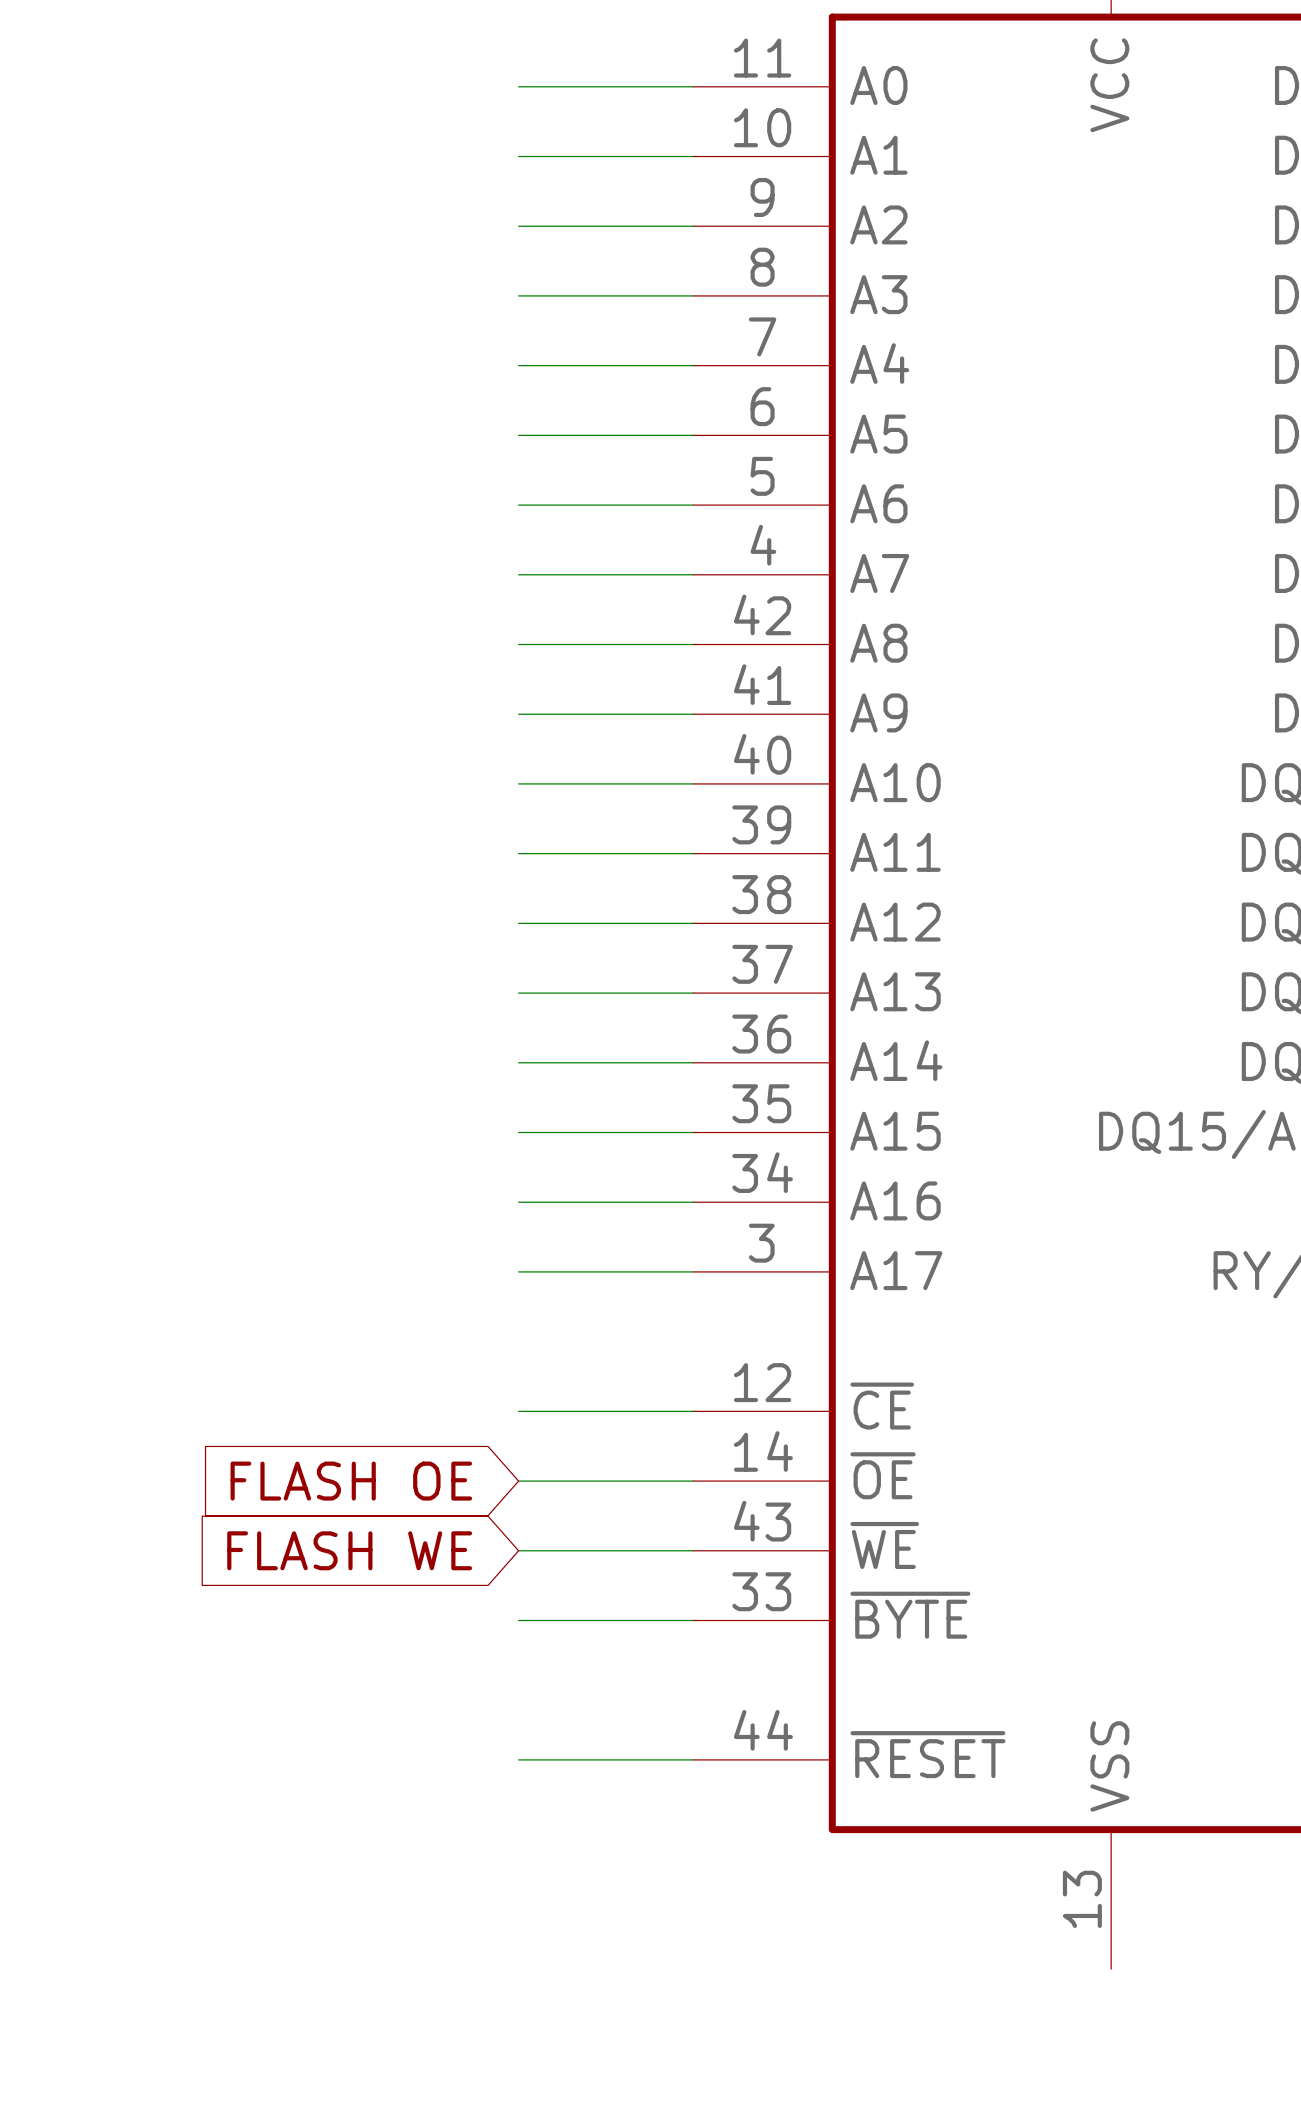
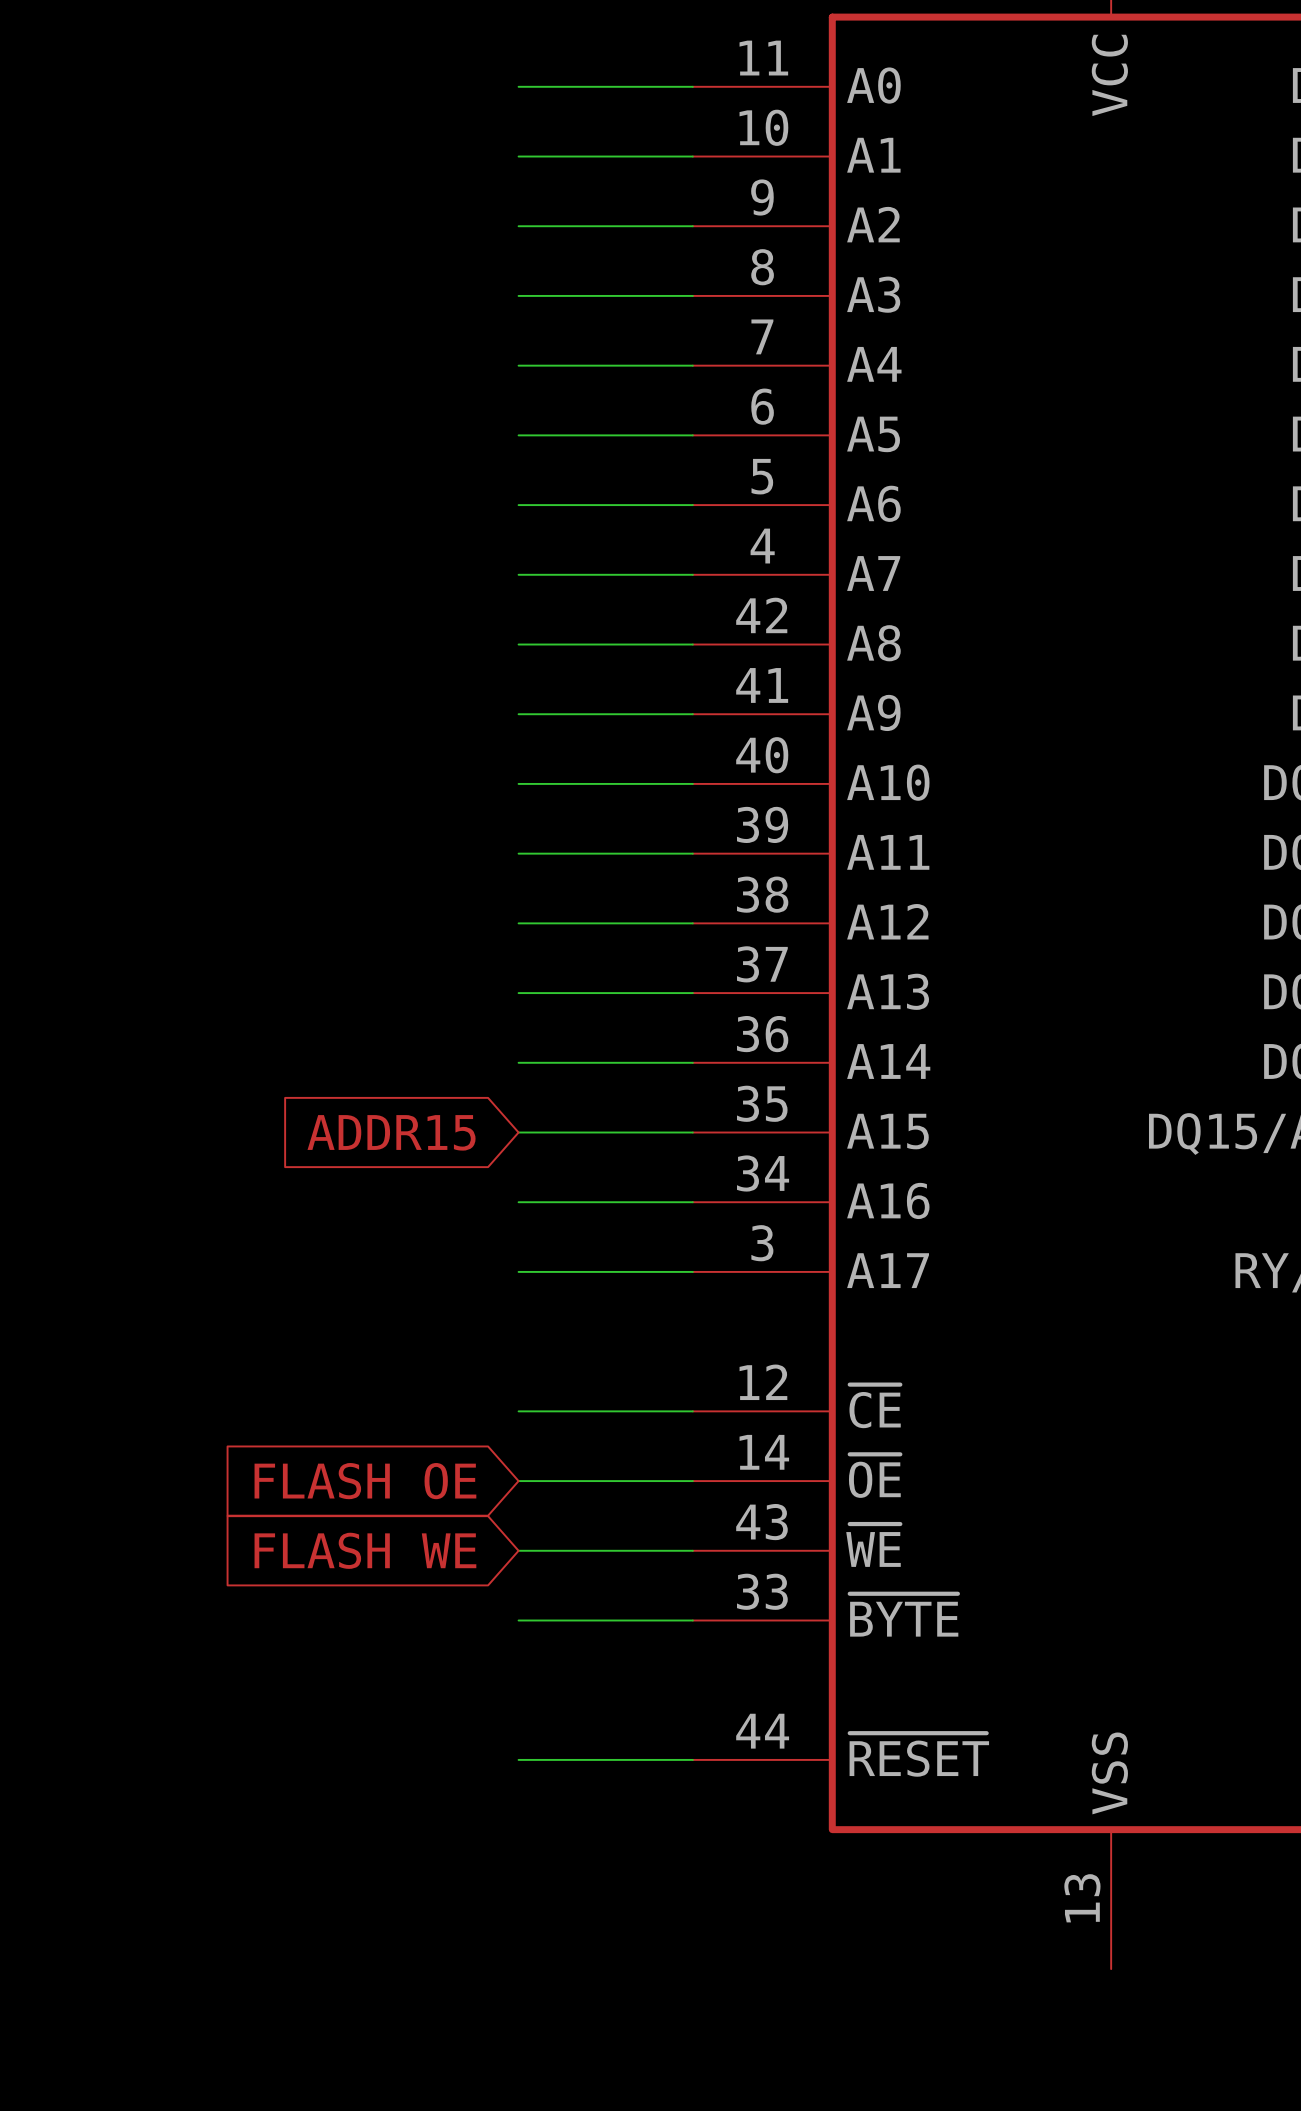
global label: none -> ADDR15 (391, 1132)

